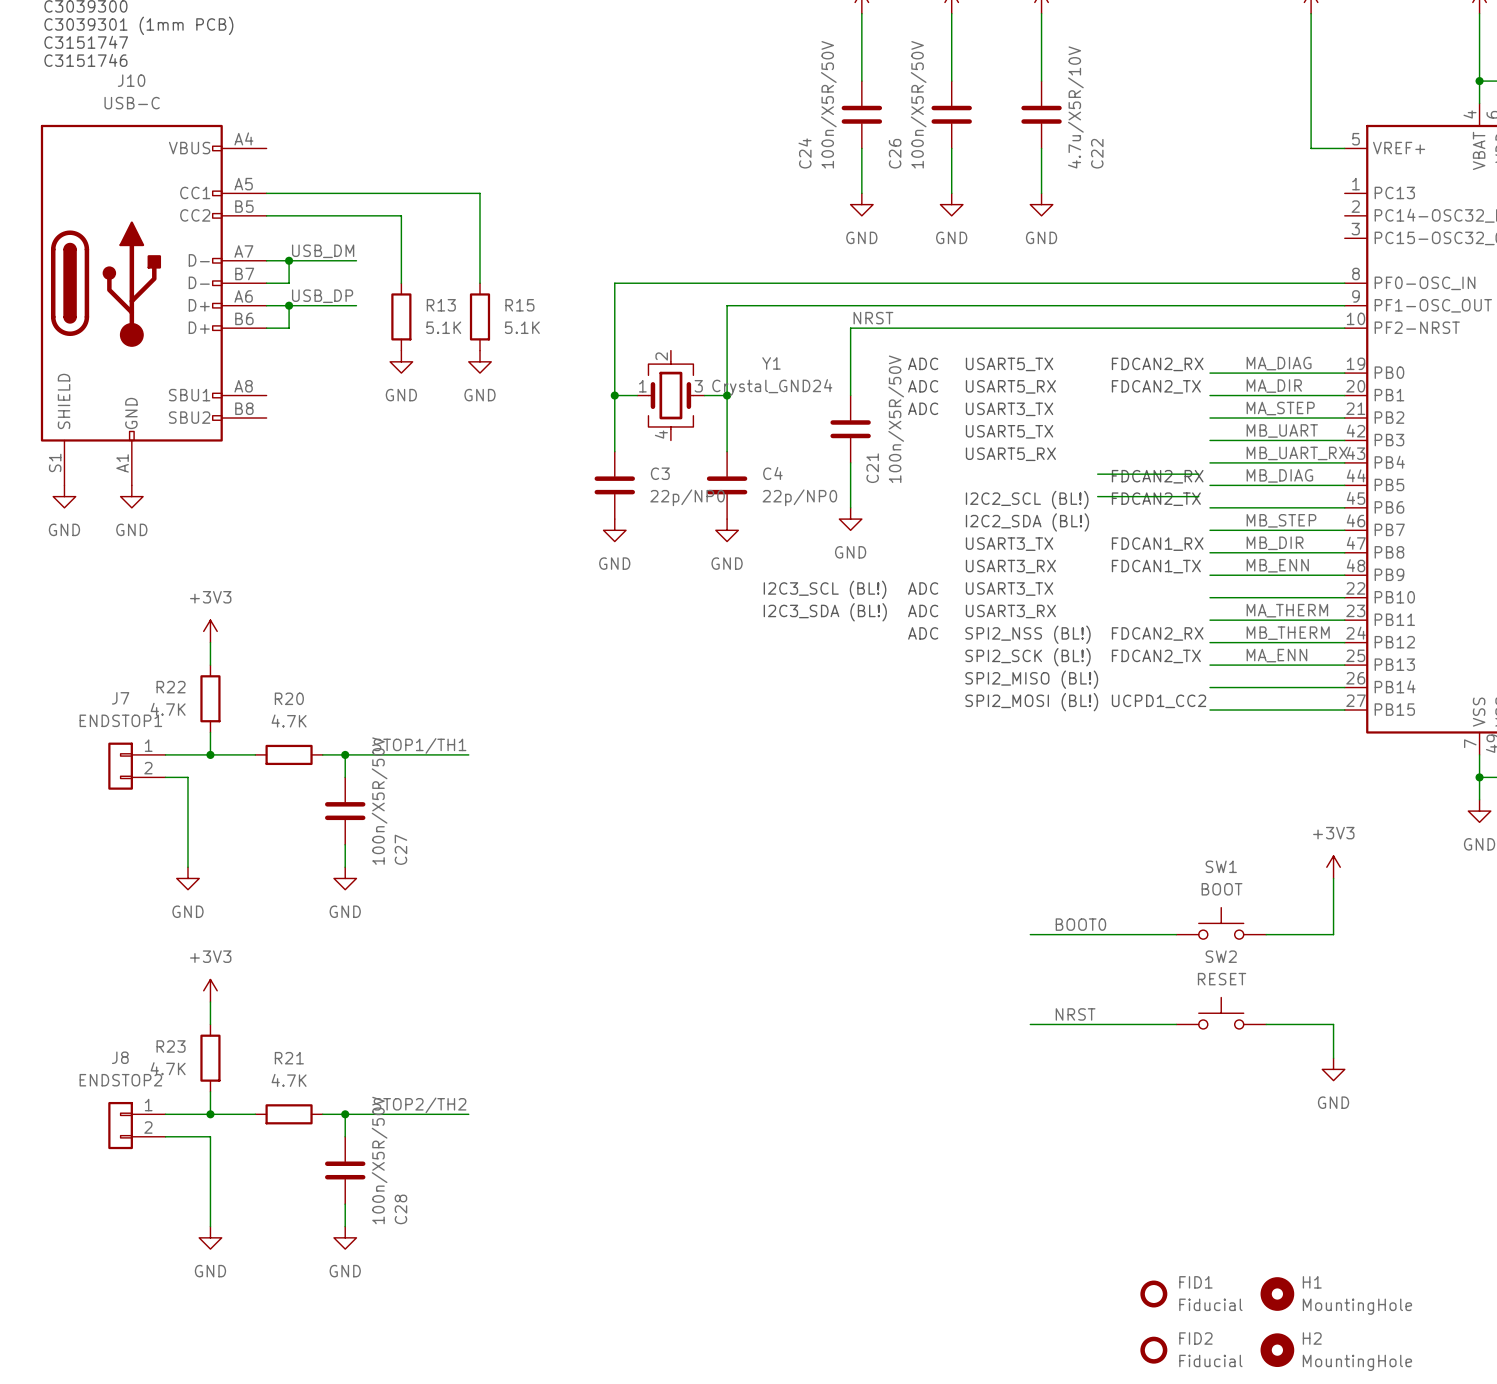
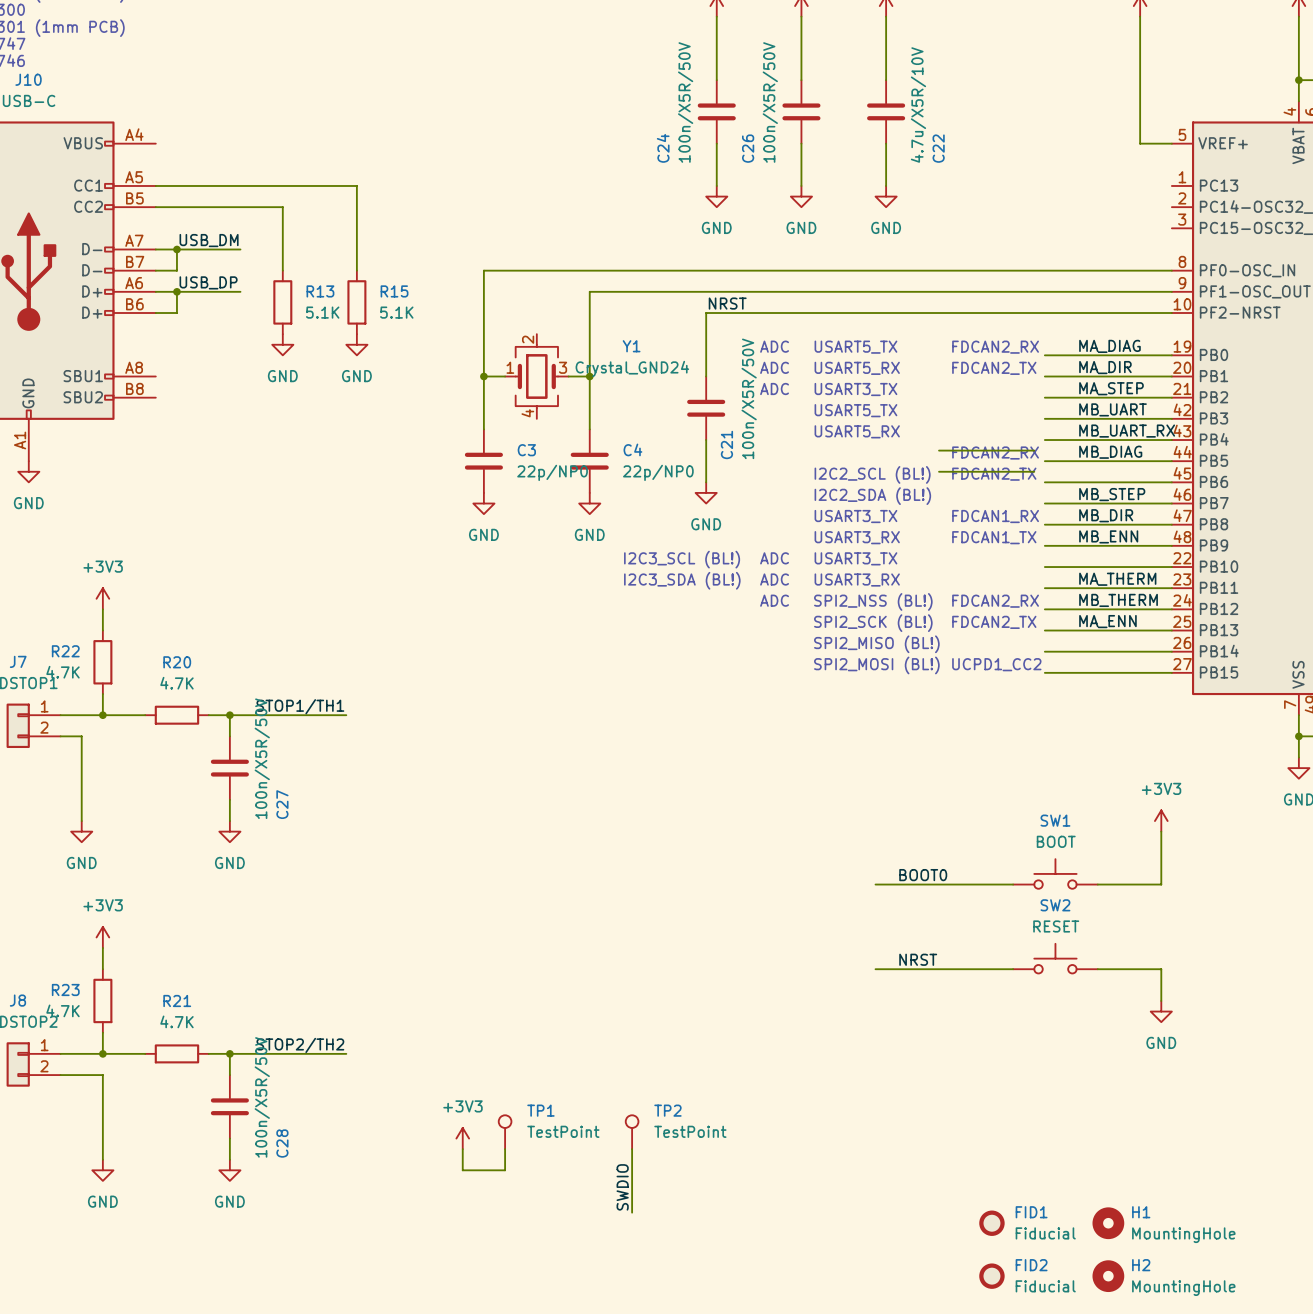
TP1: none -> TestPoint (505, 1132)
TP2: none -> TestPoint (632, 1132)
power symbol: none -> +3V3 (462, 1138)
wire: none -> (462, 1149) (462, 1170) (505, 1170) (505, 1149)
wire: none -> (632, 1149) (632, 1212)
label: none -> SWDIO (622, 1187)

